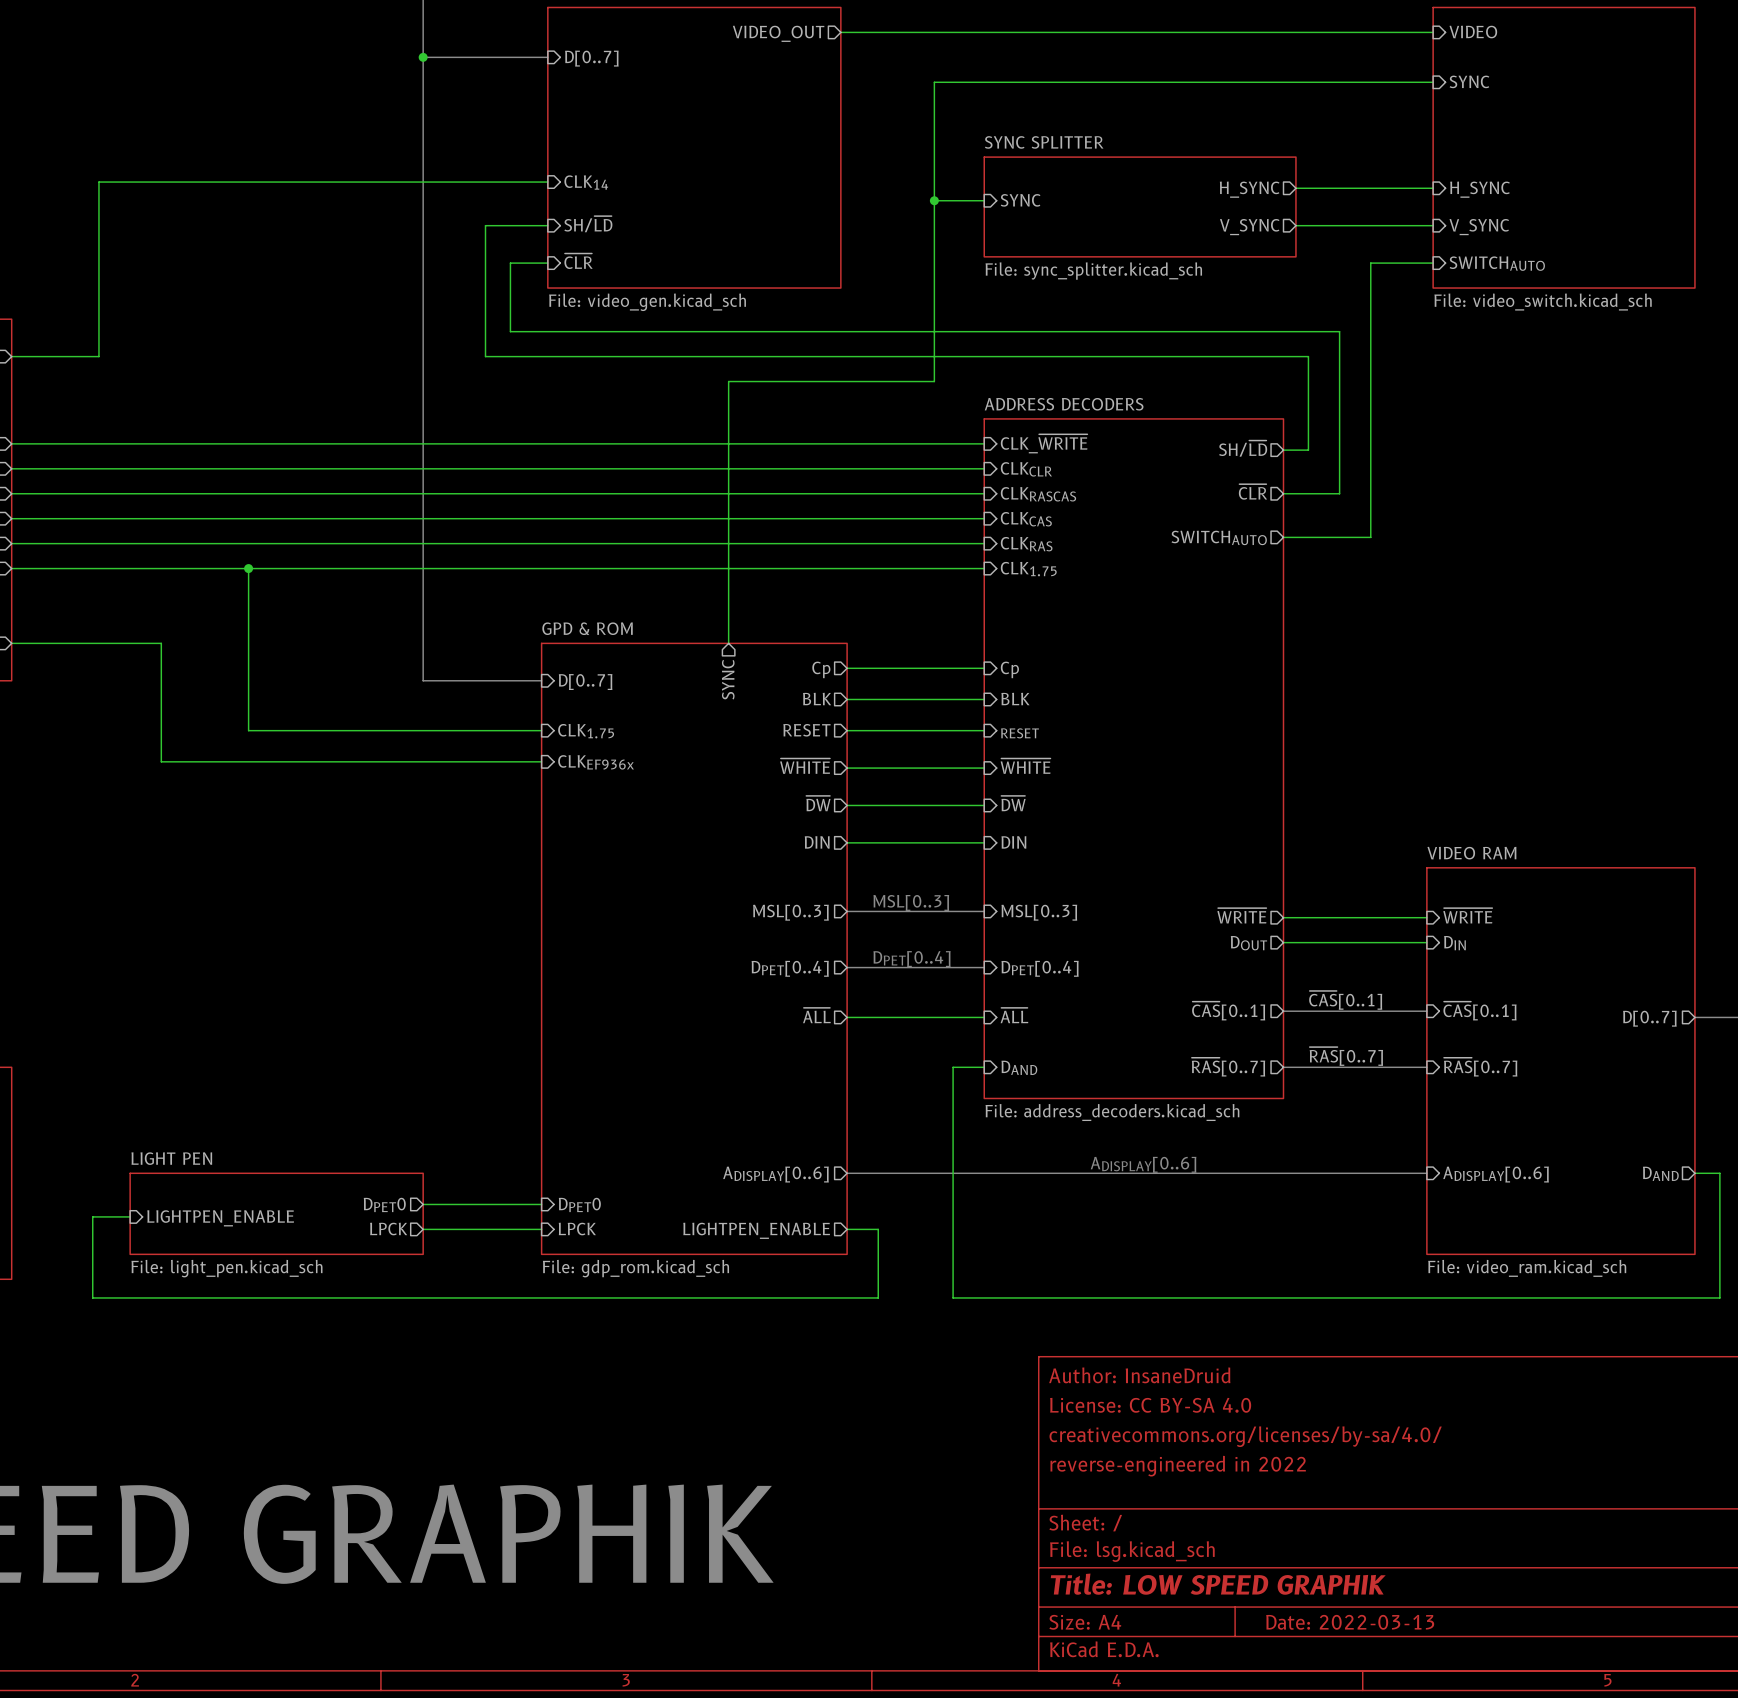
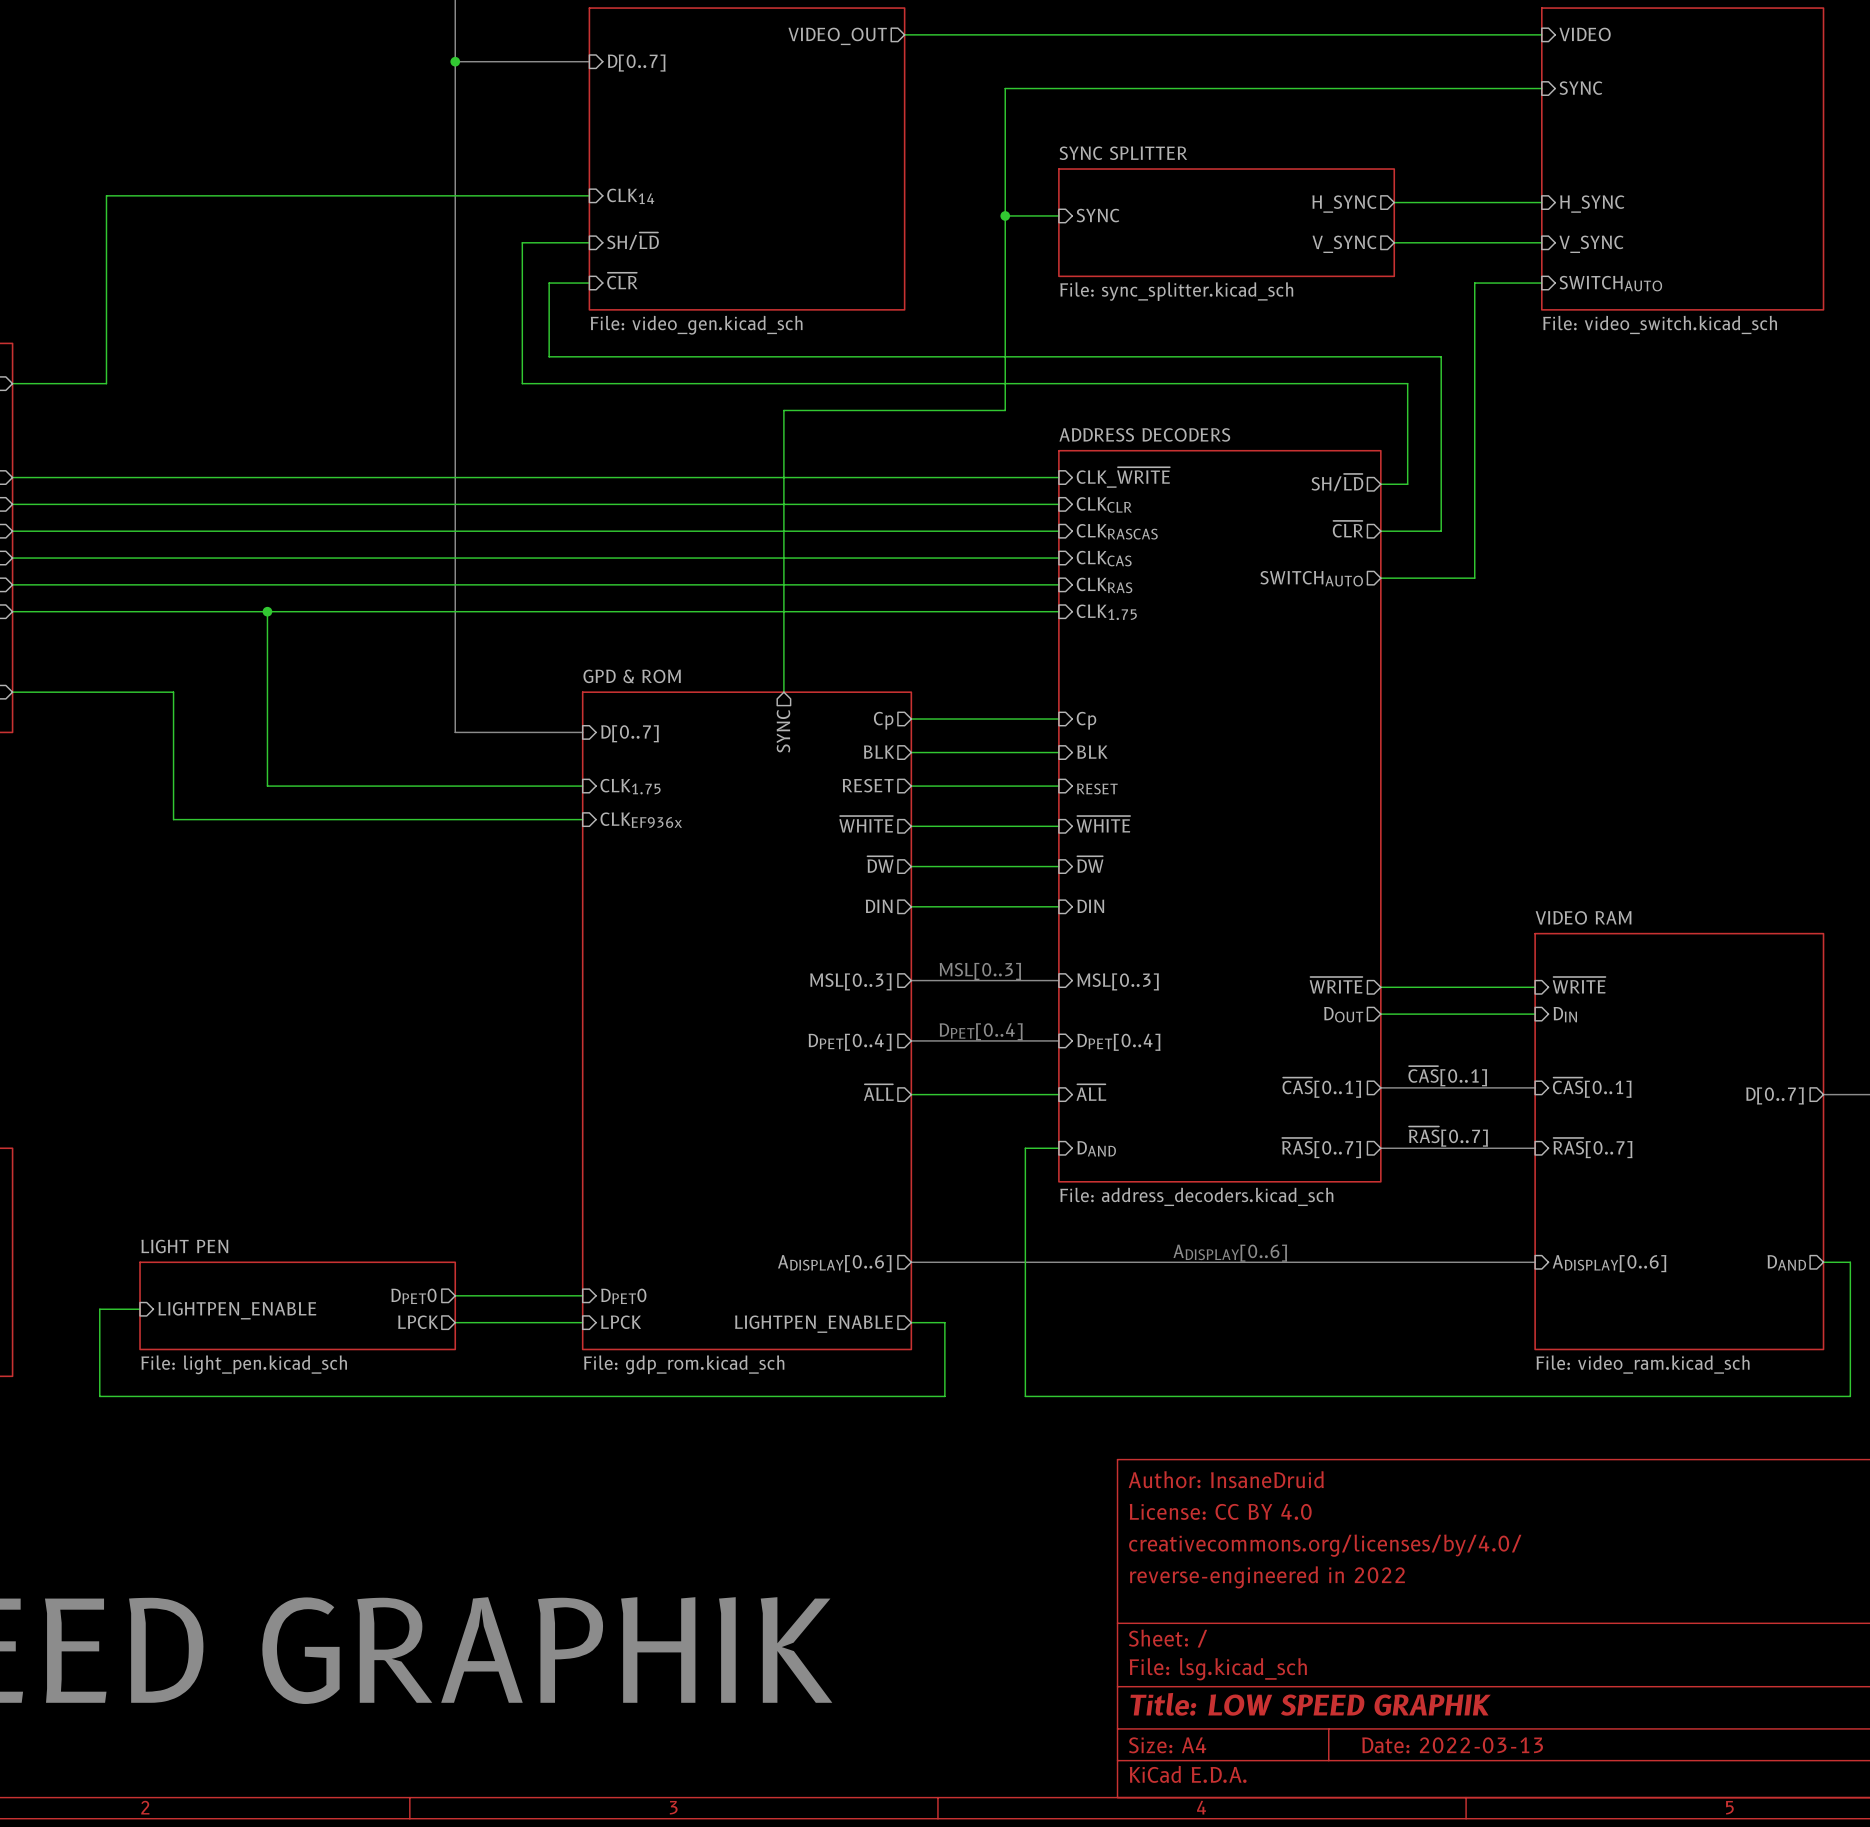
title block: License: CC BY-SA 4.0 (1150, 1405) -> License: CC BY 4.0 (1220, 1511)
title block: creativecommons.org/licenses/by-sa/4.0/ (1245, 1436) -> creativecommons.org/licenses/by/4.0/ (1325, 1545)

